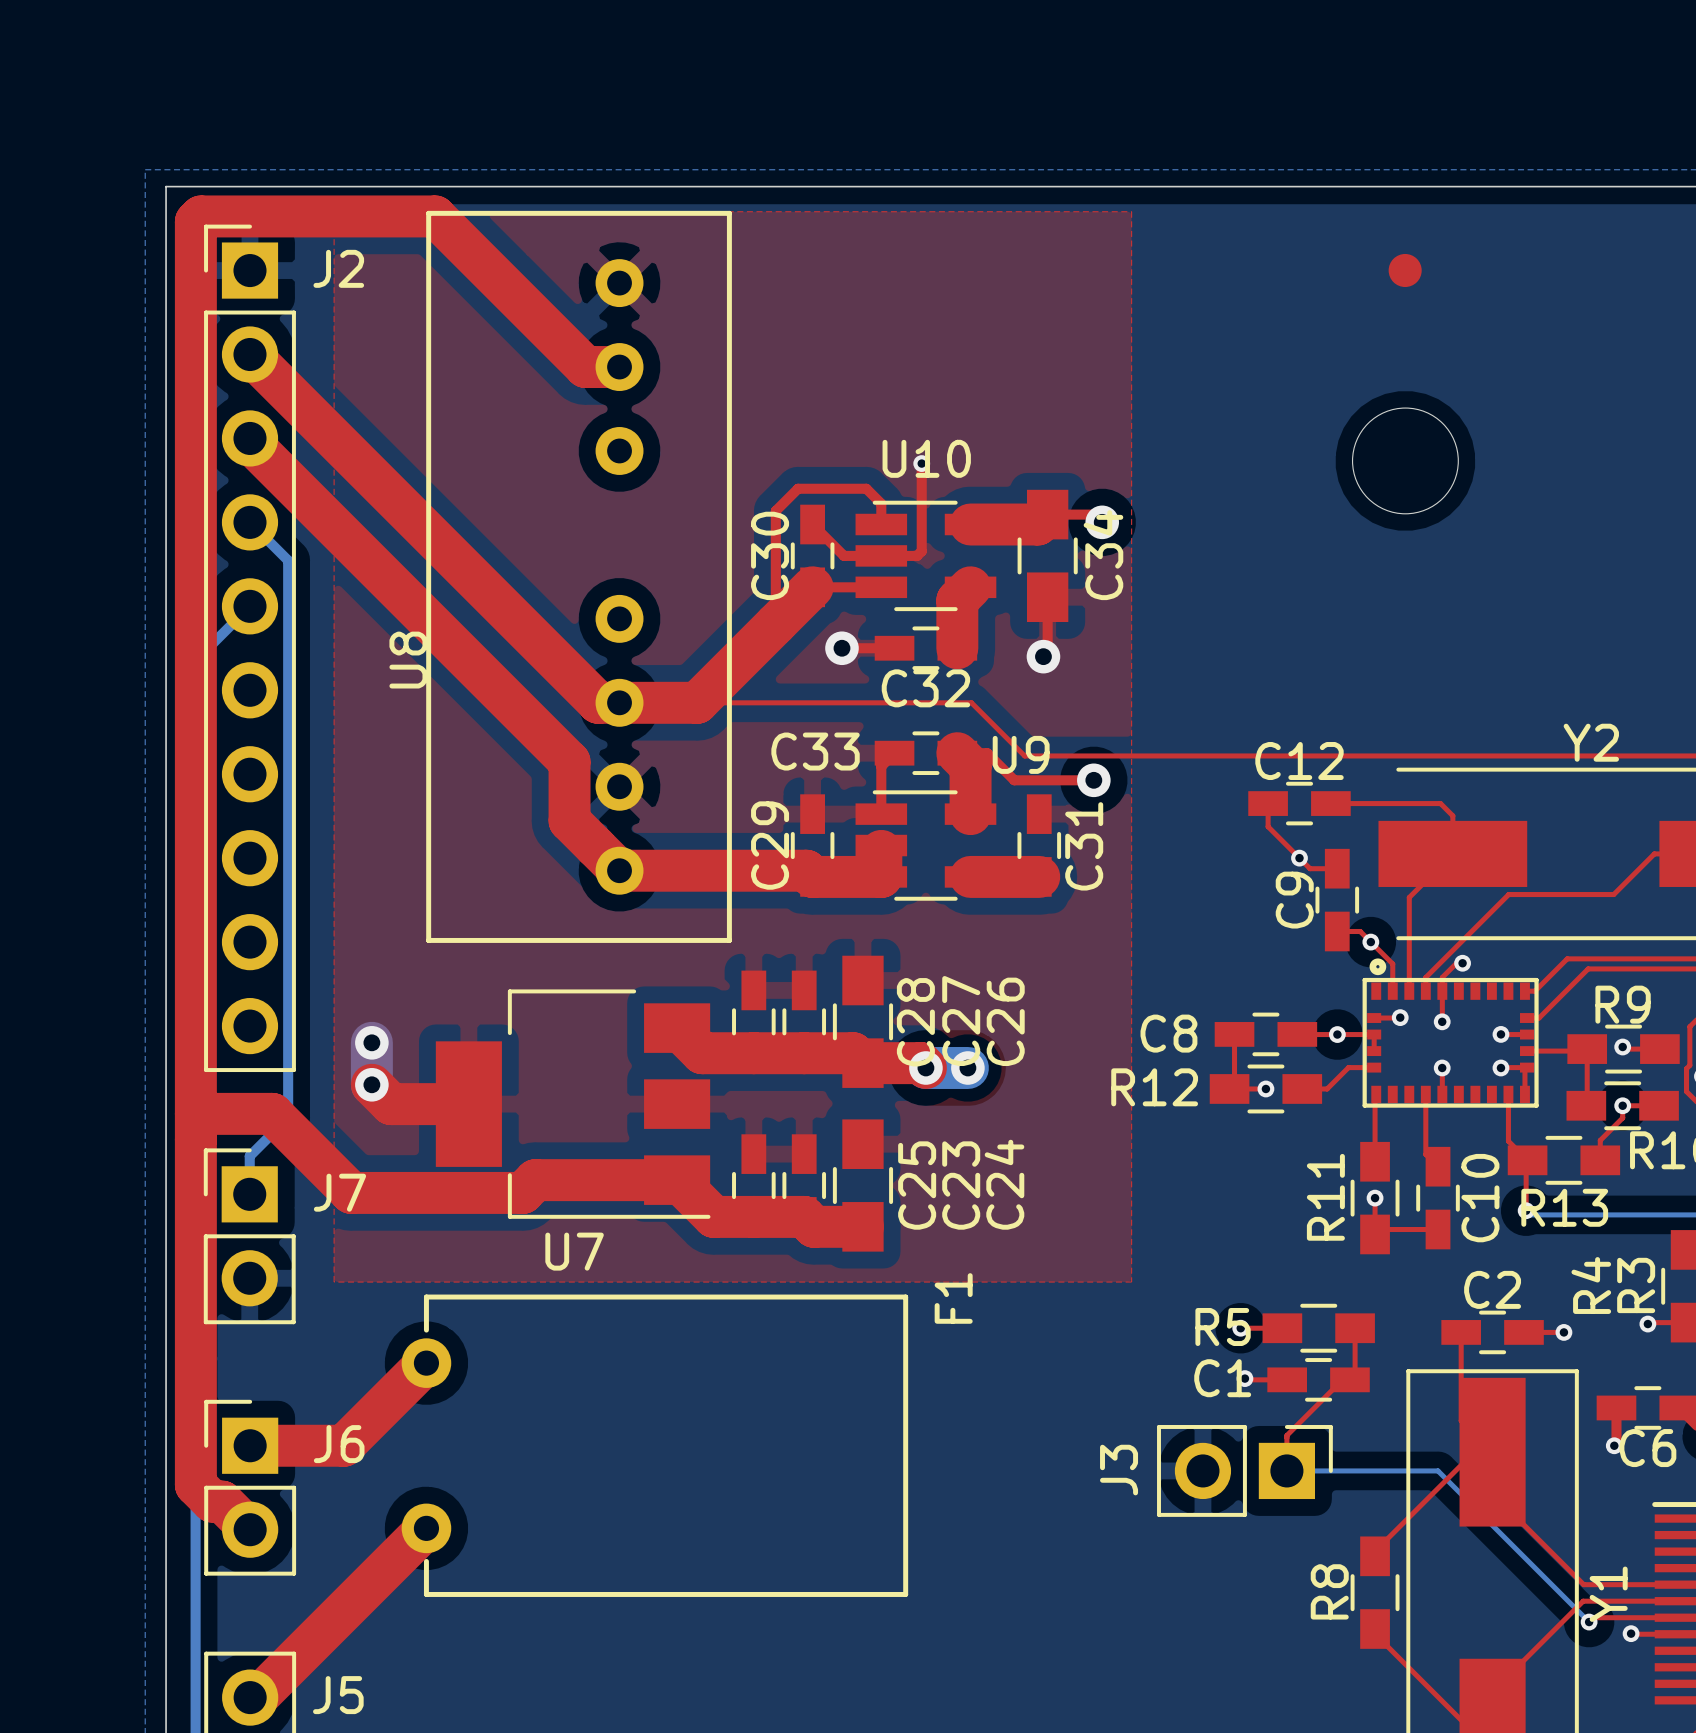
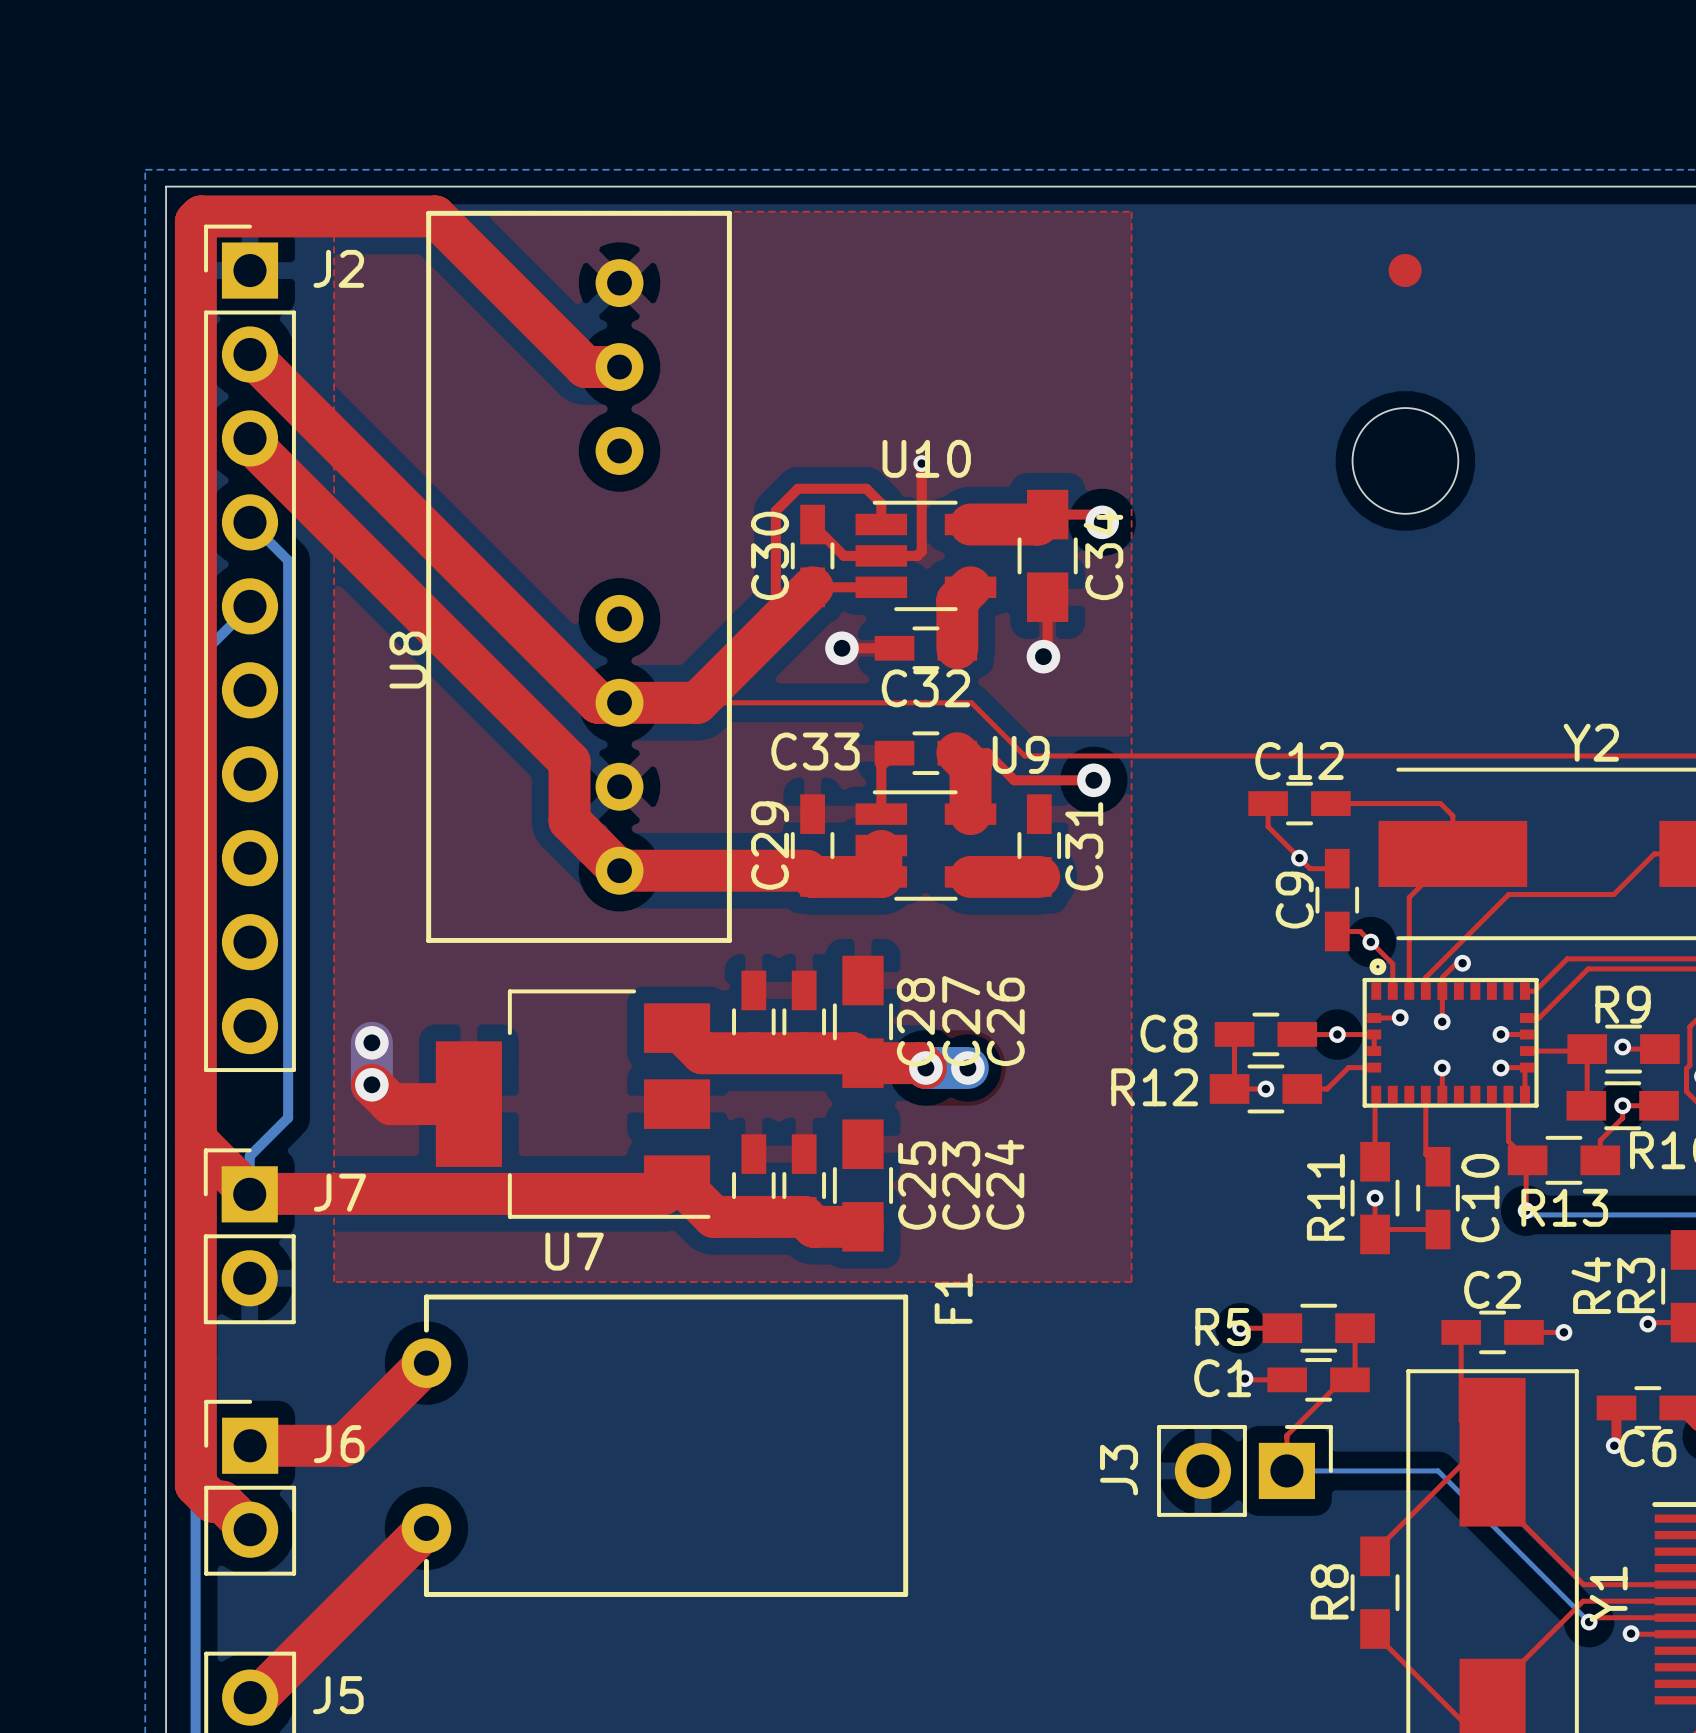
top track: (195, 1113) (272, 1113) (351, 1192) (522, 1192) (535, 1180) (677, 1180) -> (195, 1139) (250, 1193) (663, 1193) (677, 1180)

